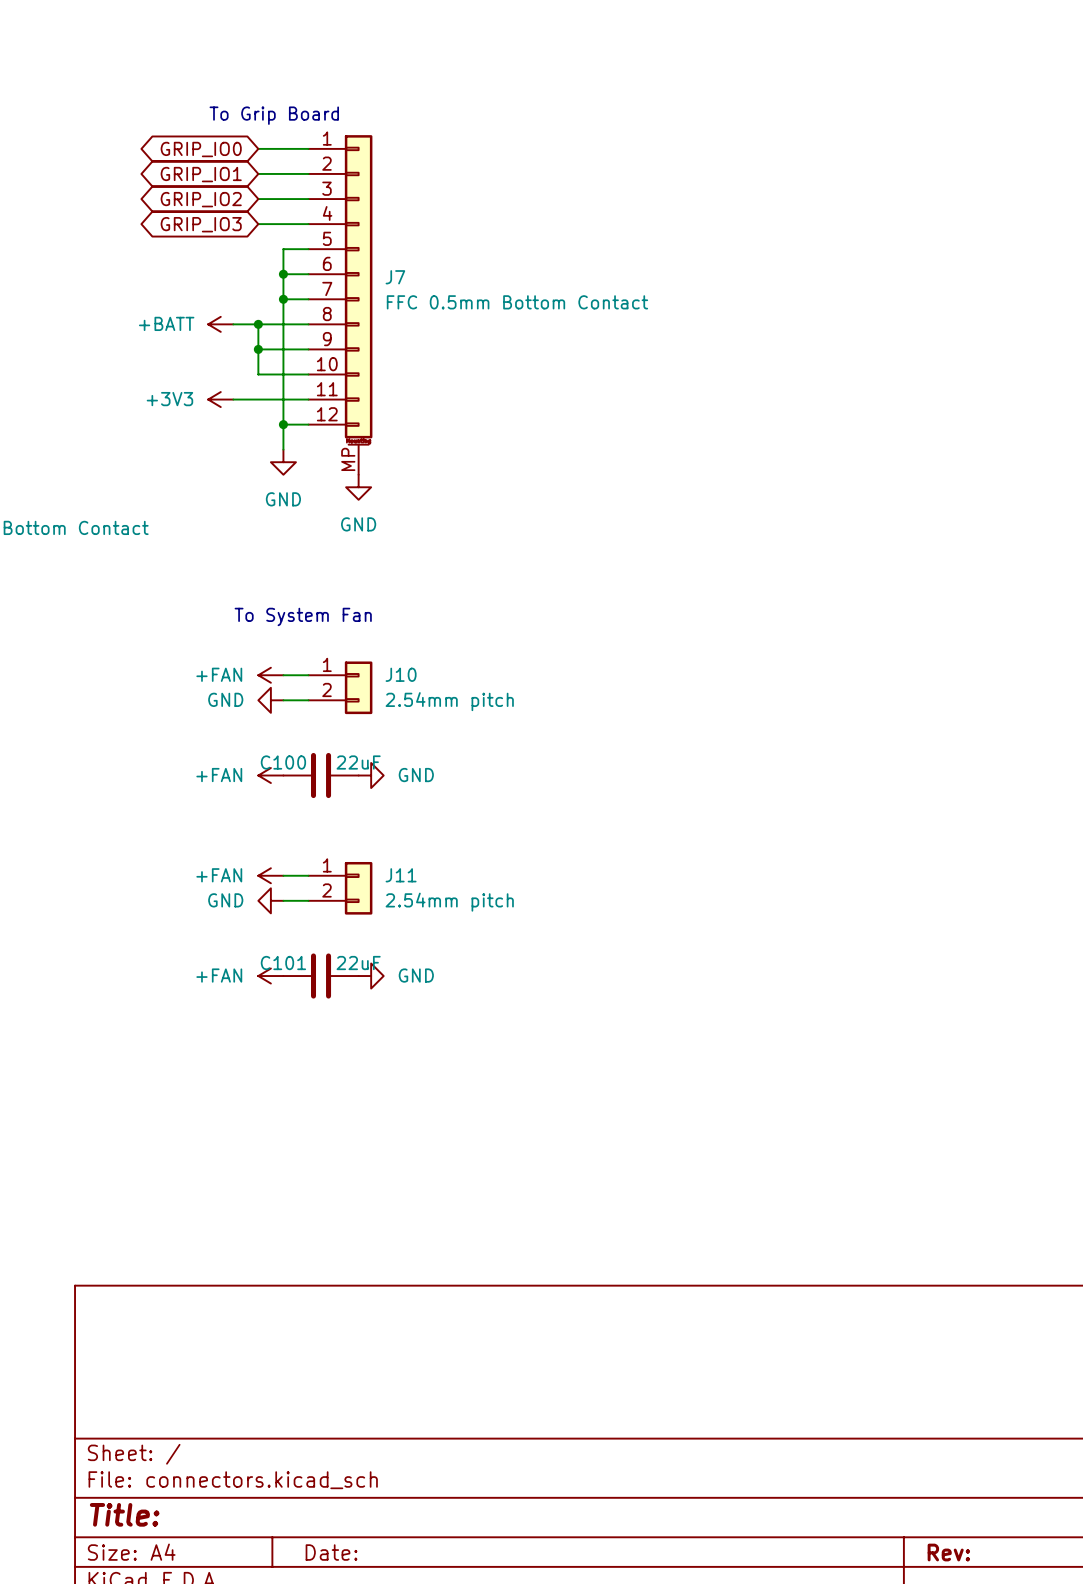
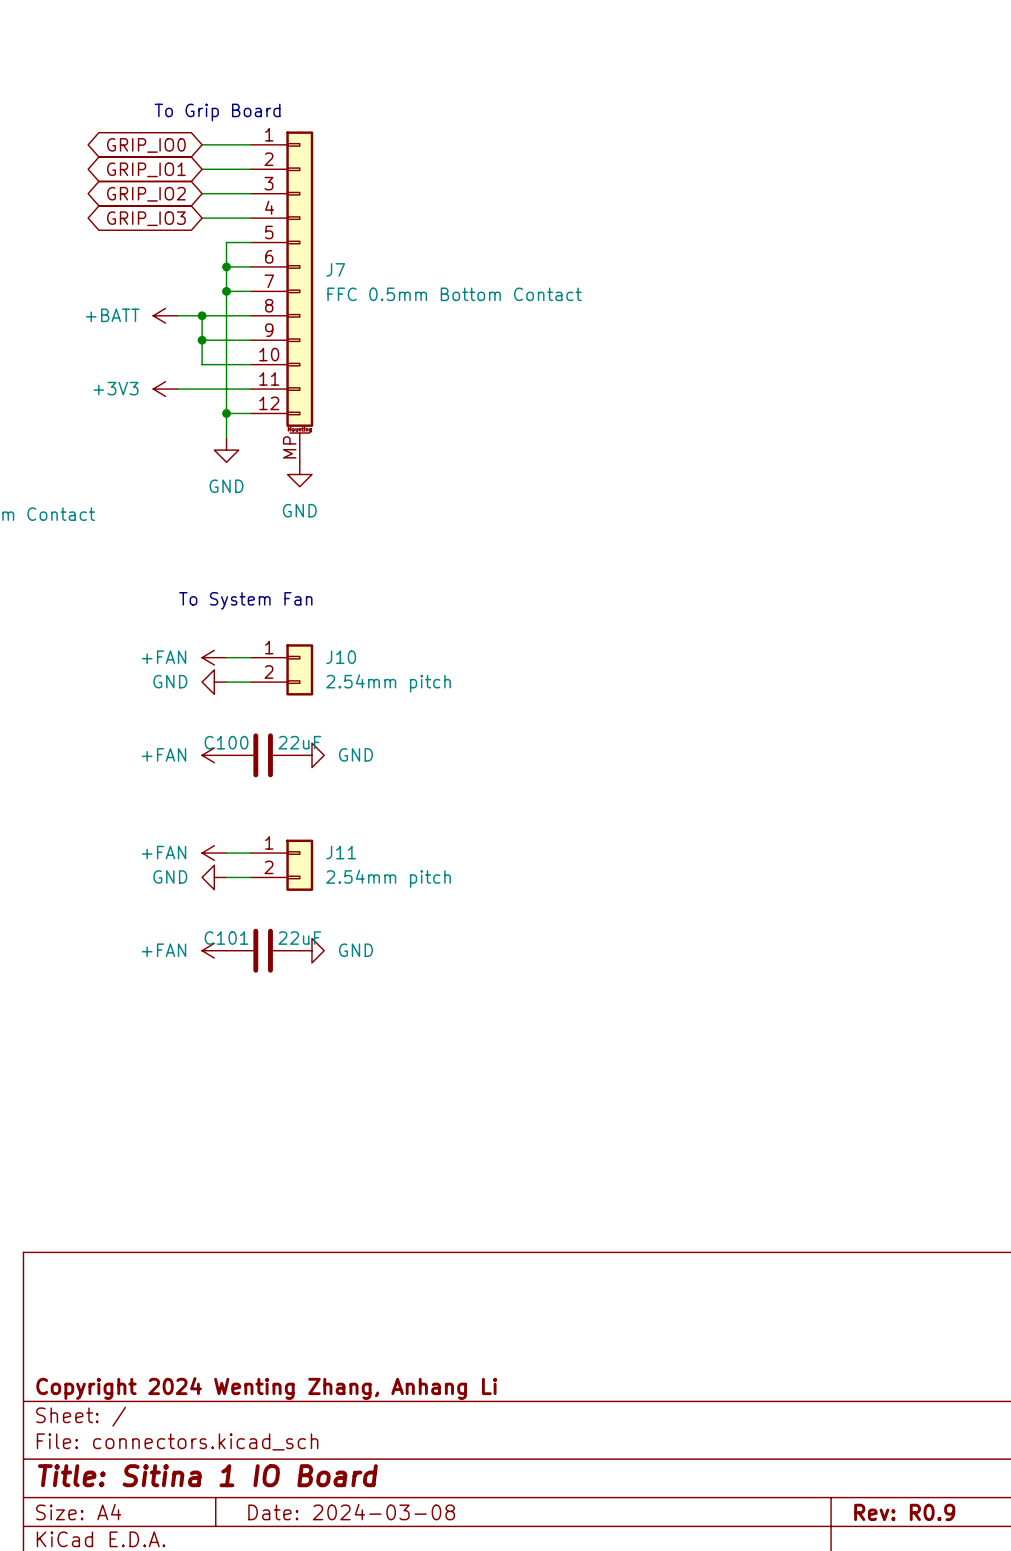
title block: none -> Copyright 2024 Wenting Zhang, Anhang Li (266, 1388)
title block: Title: (124, 1514) -> Title: Sitina 1 IO Board (207, 1475)
title block: Date: (331, 1552) -> Date: 2024-03-08 (351, 1512)
title block: Rev: (948, 1552) -> Rev: R0.9 (904, 1512)

